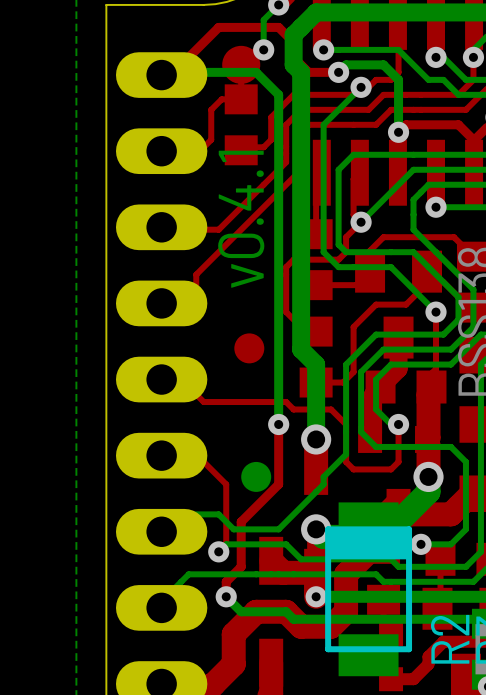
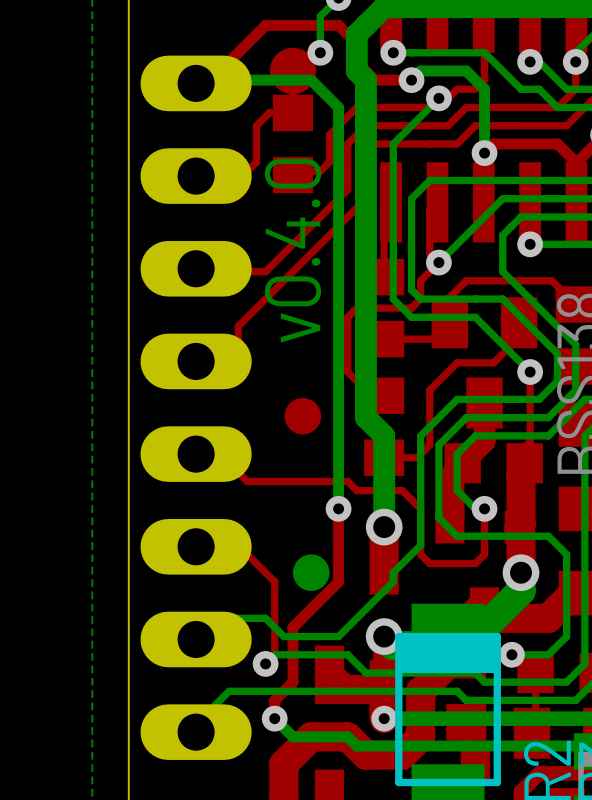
text: v0.4.1 (241, 219) -> v0.4.0 (293, 250)

